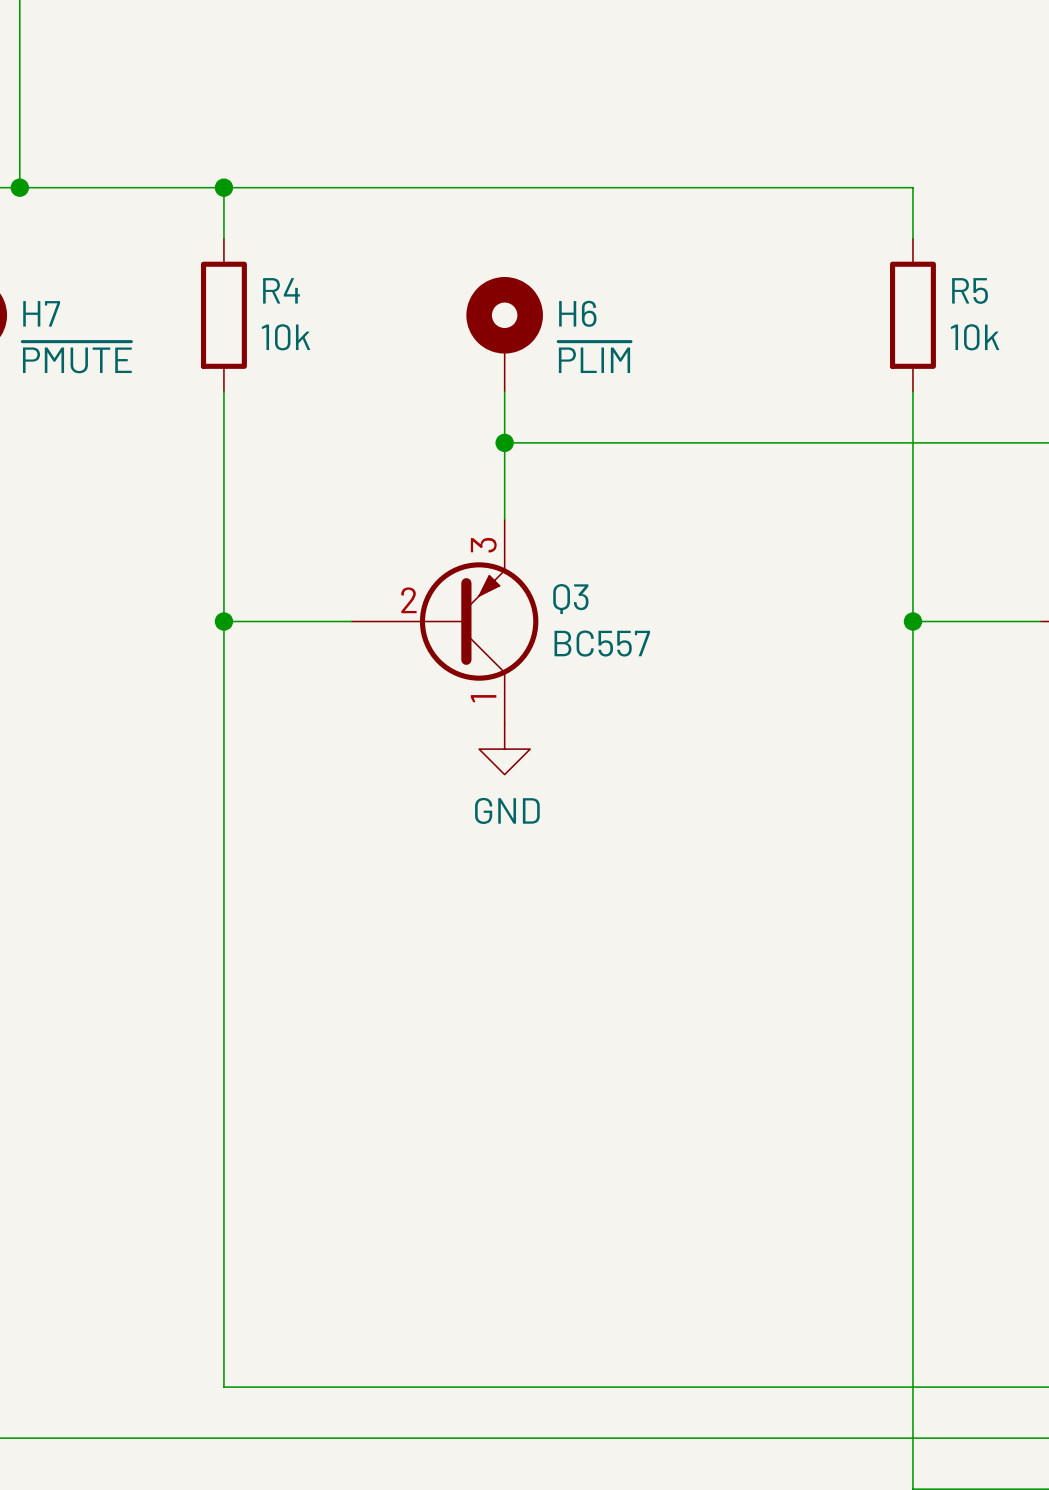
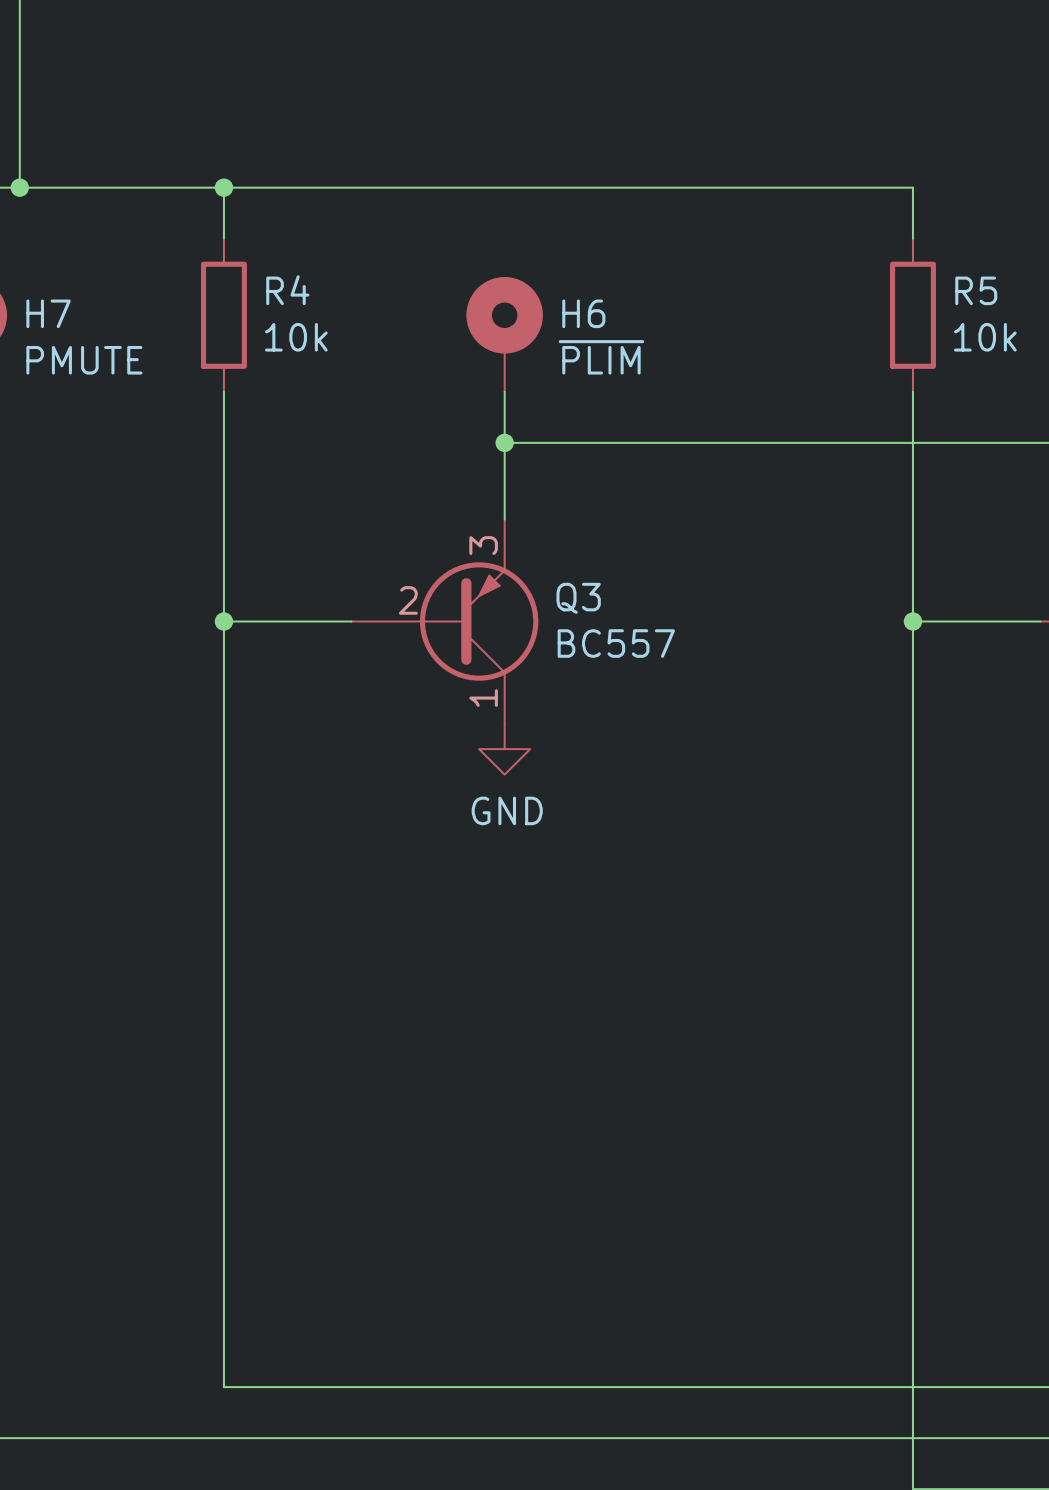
H7 value: ~{PMUTE} (77, 357) -> PMUTE (84, 360)

